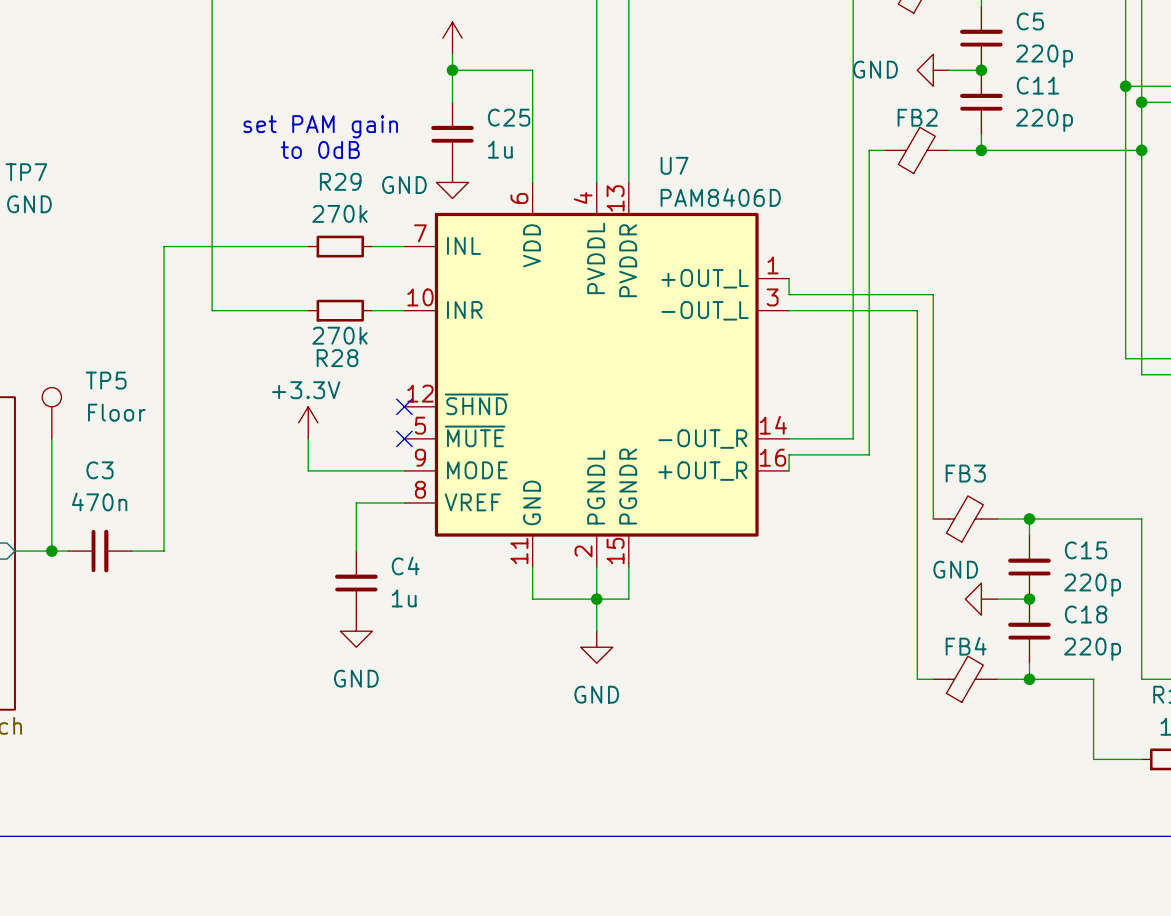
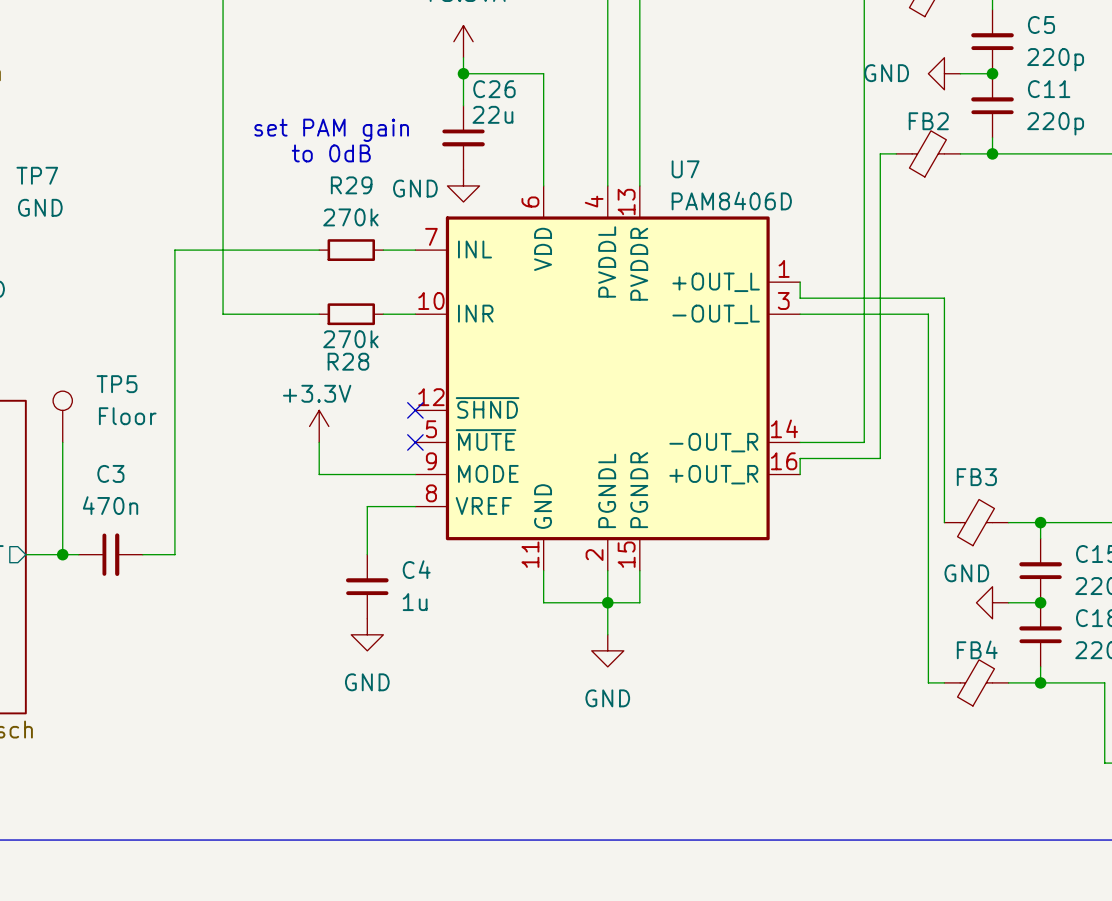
C25: 1u (452, 134) -> none
C26: none -> 22u (463, 137)

